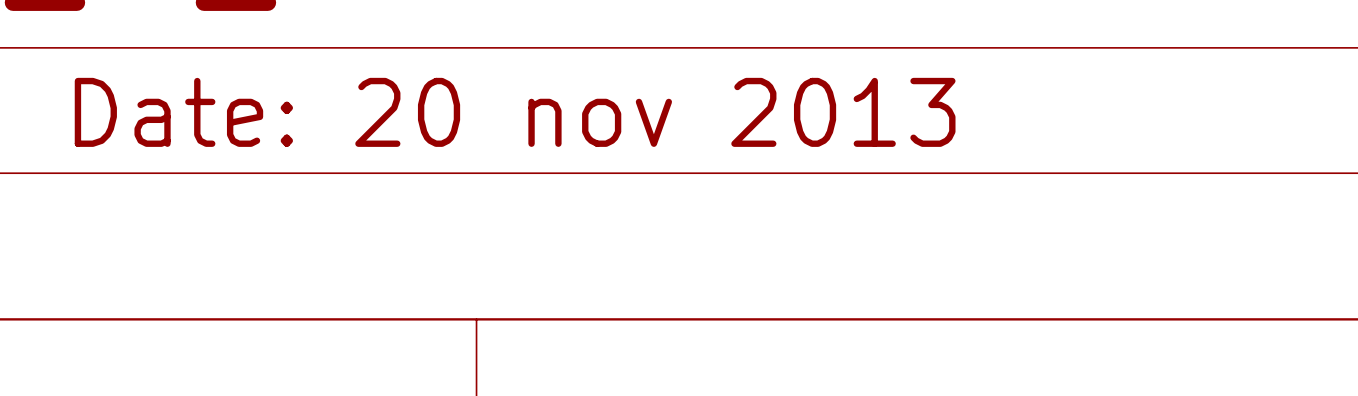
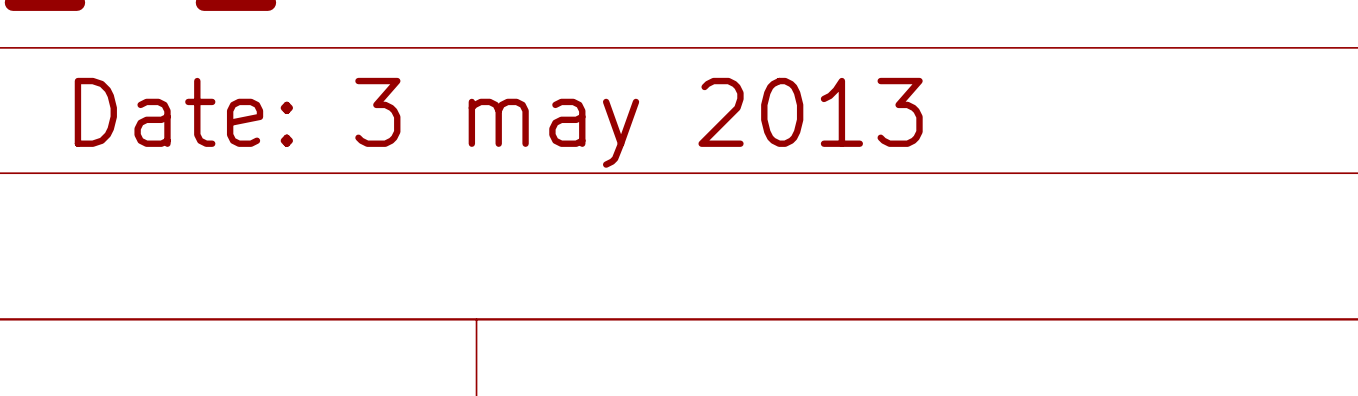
title block: Date: 20 nov 2013 (515, 112) -> Date: 3 may 2013 (498, 122)

